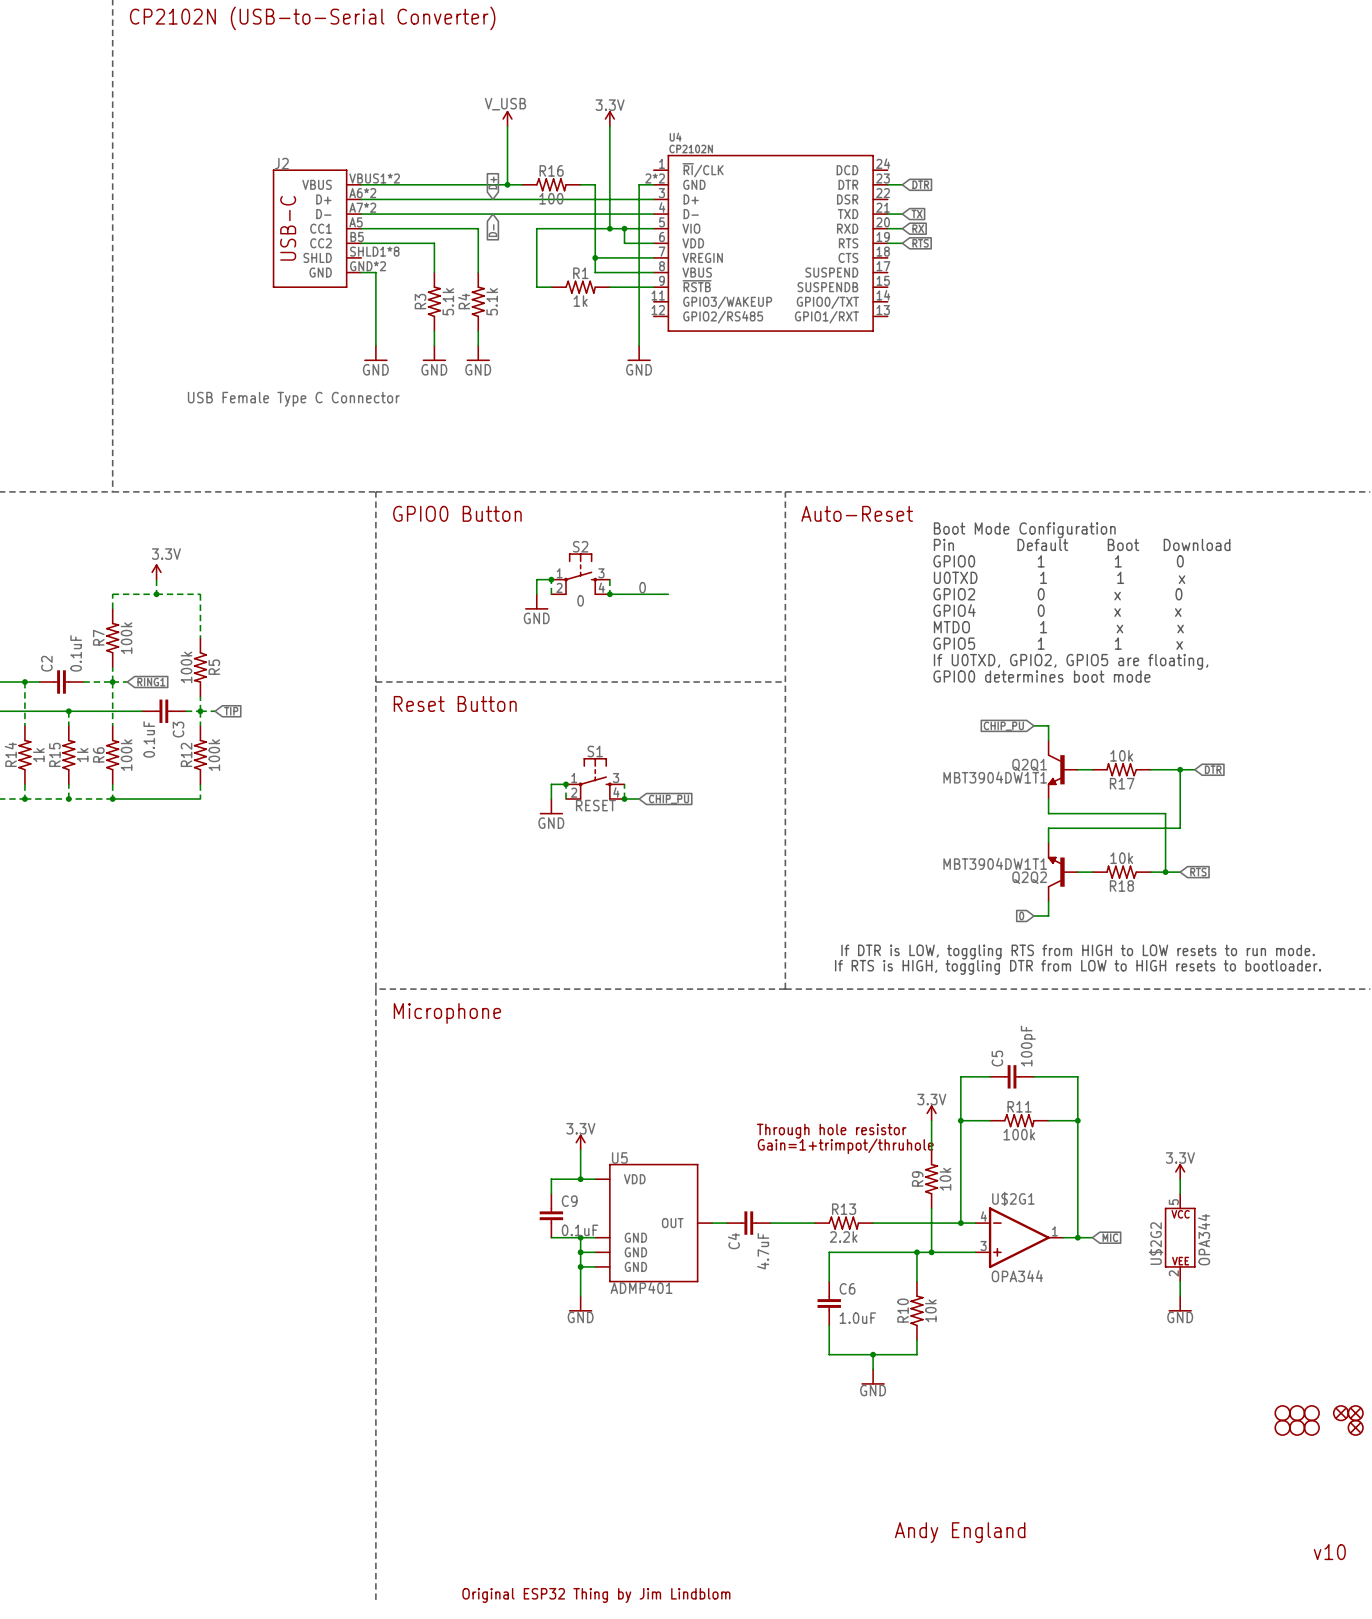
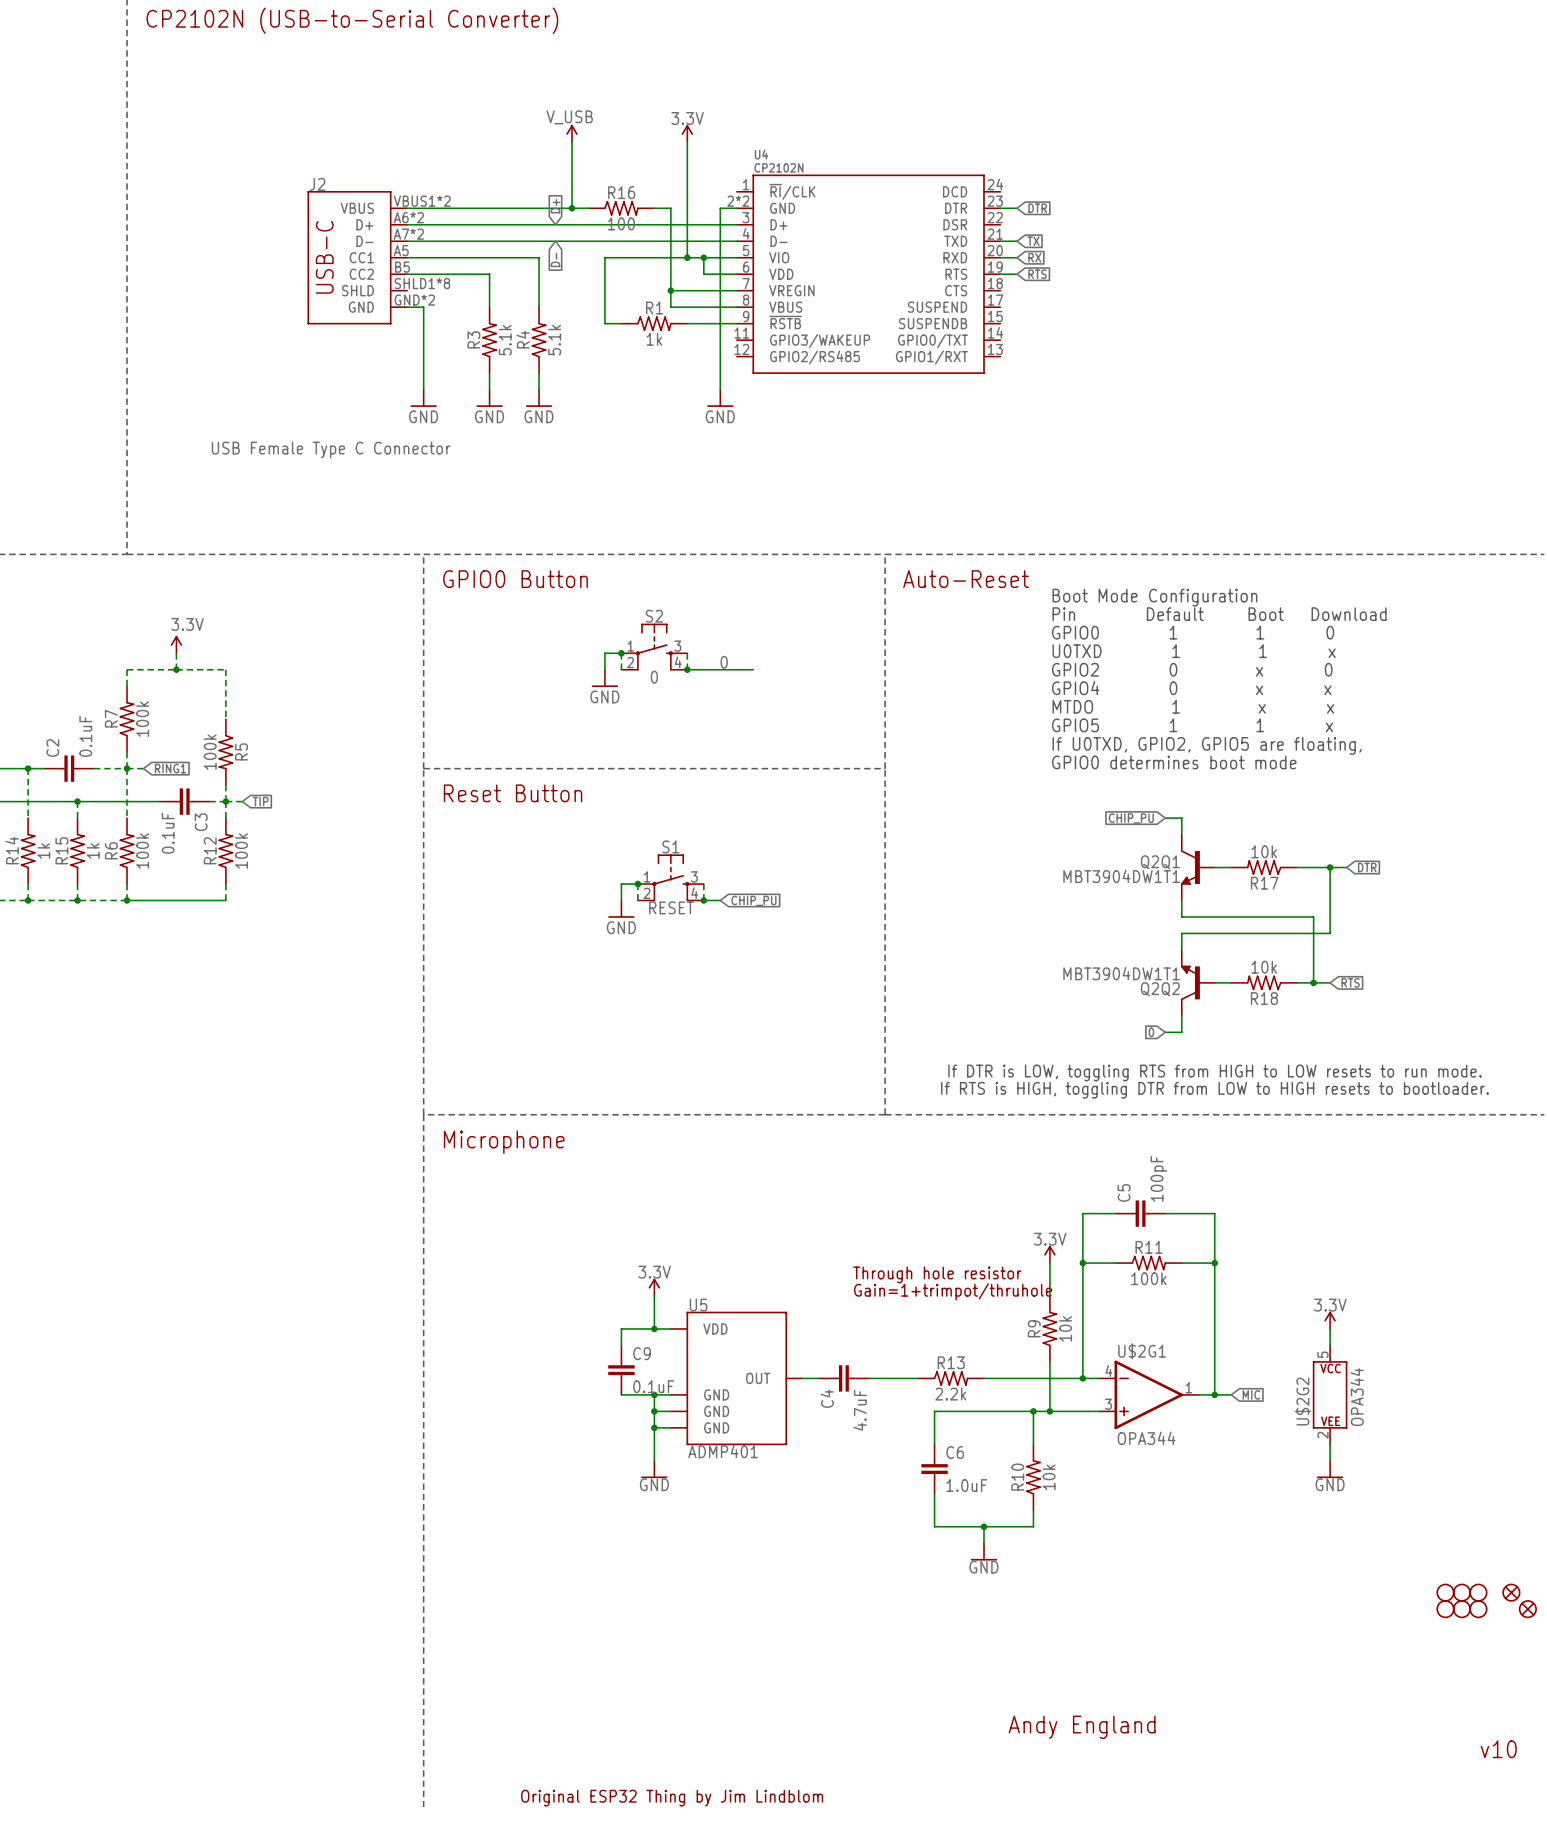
part: (1355, 1413) -> none

